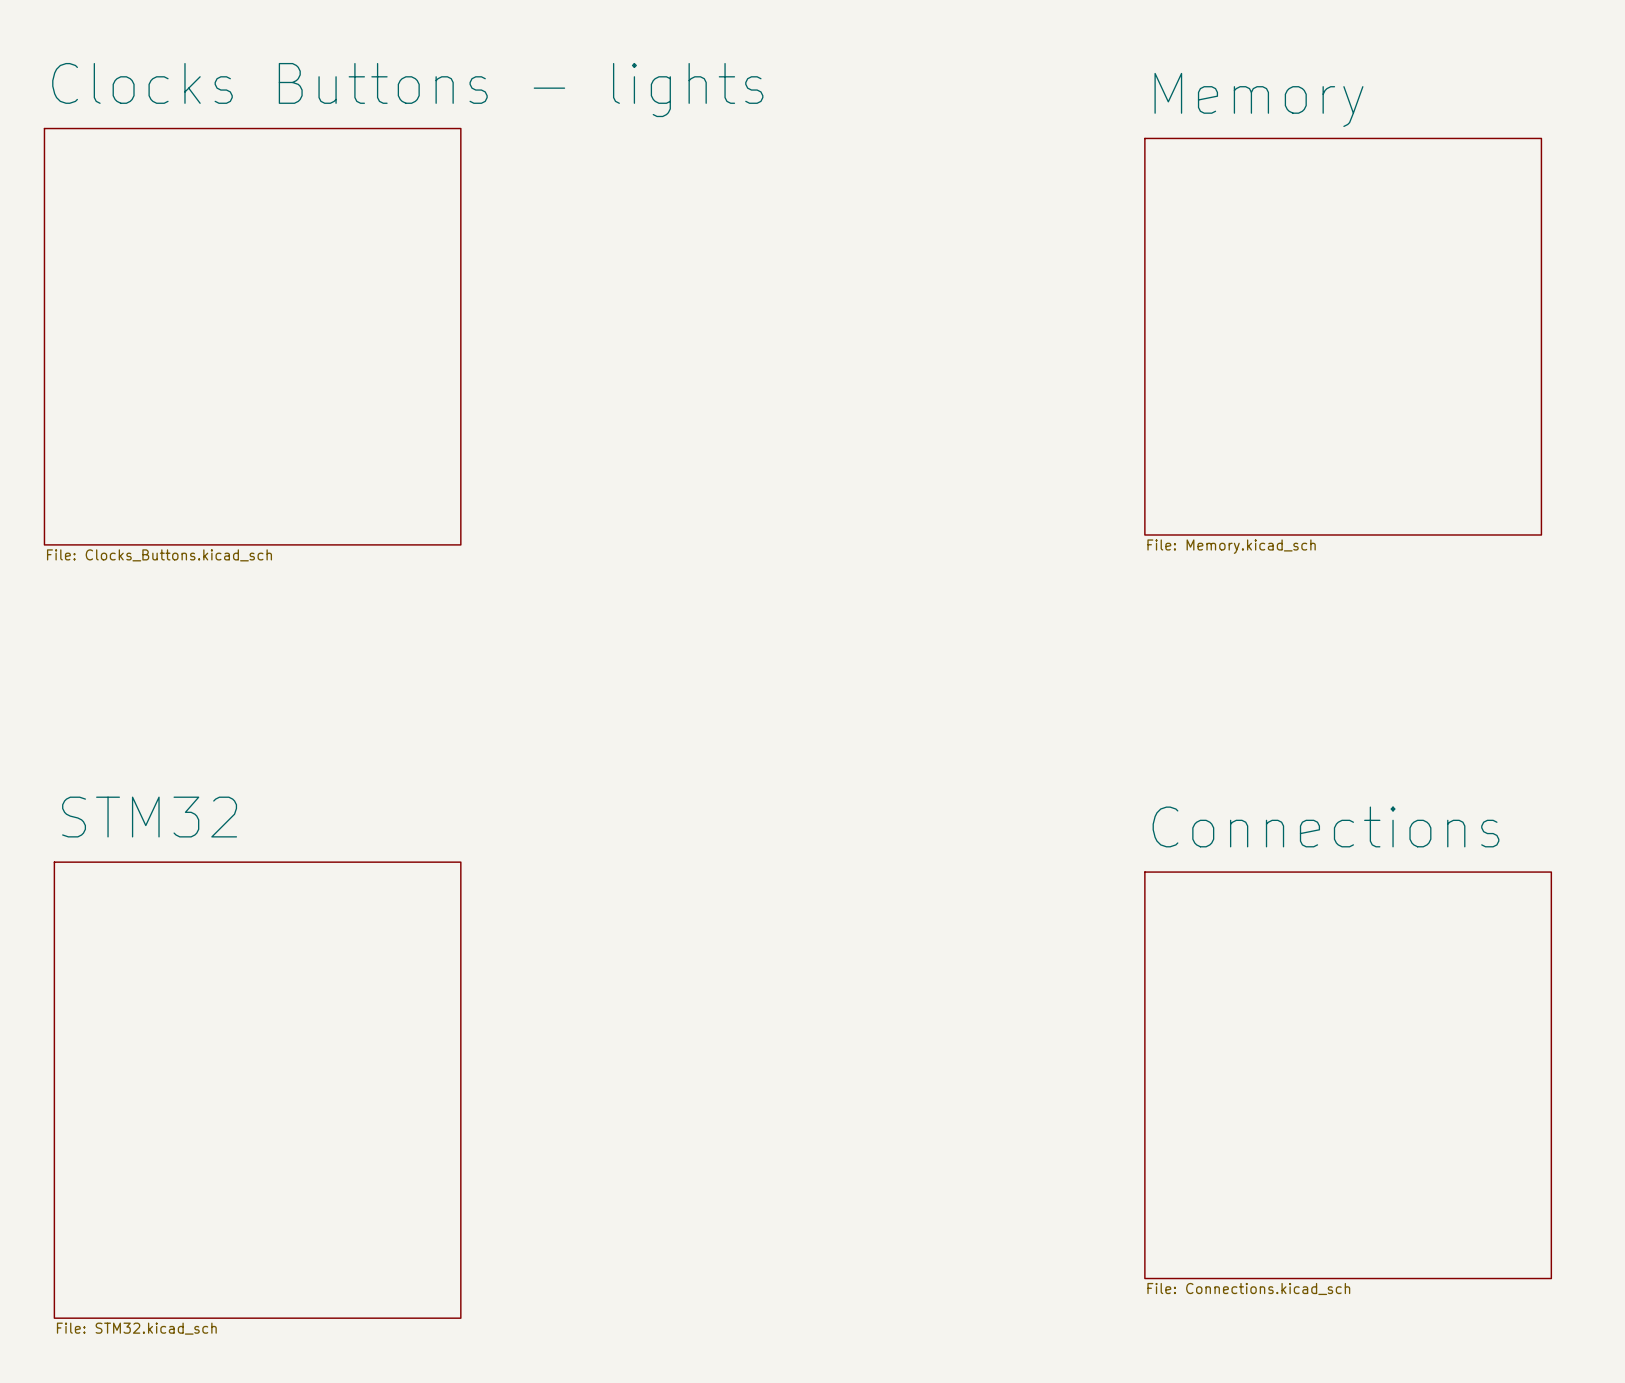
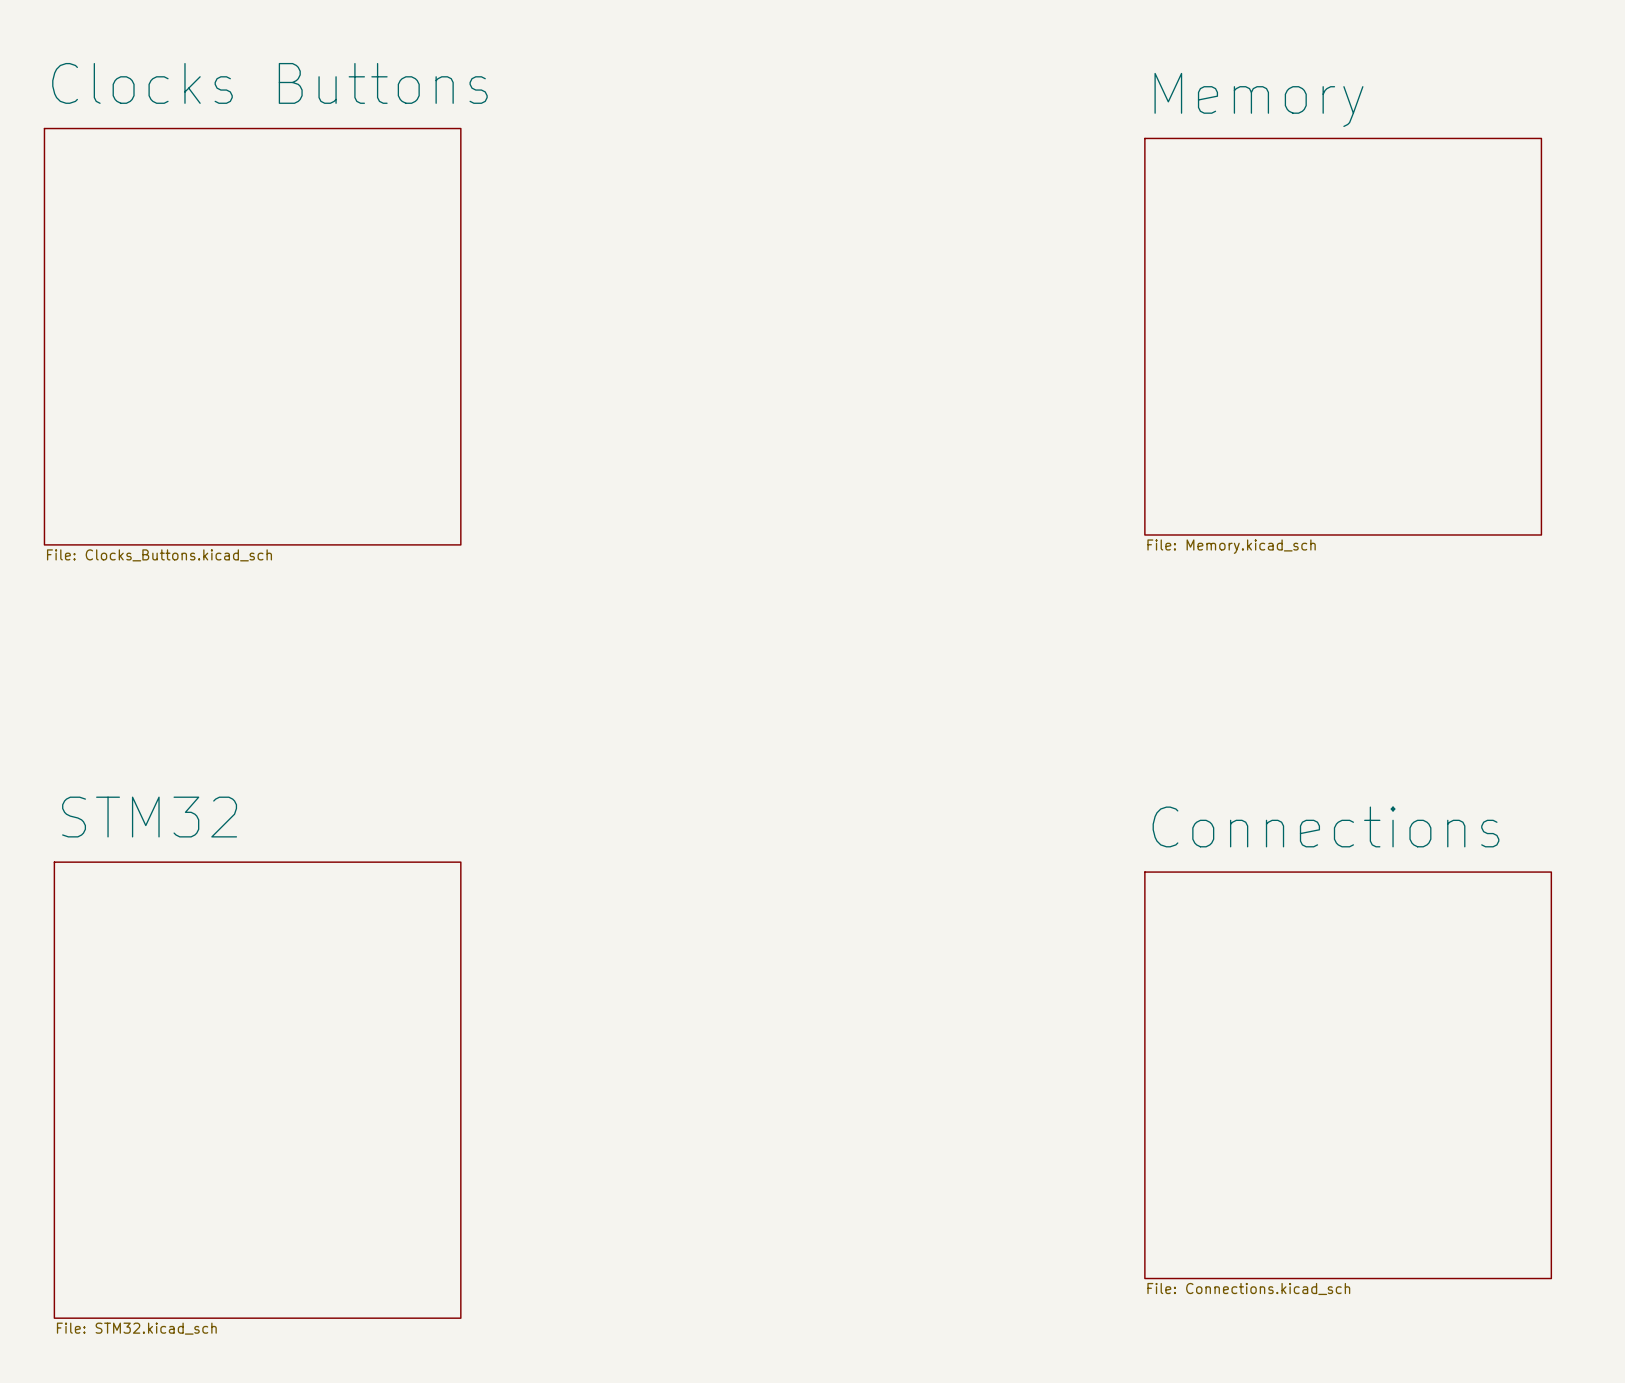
sheet Clocks Buttons - lights name: Clocks Buttons - lights (407, 90) -> Clocks Buttons (269, 83)

